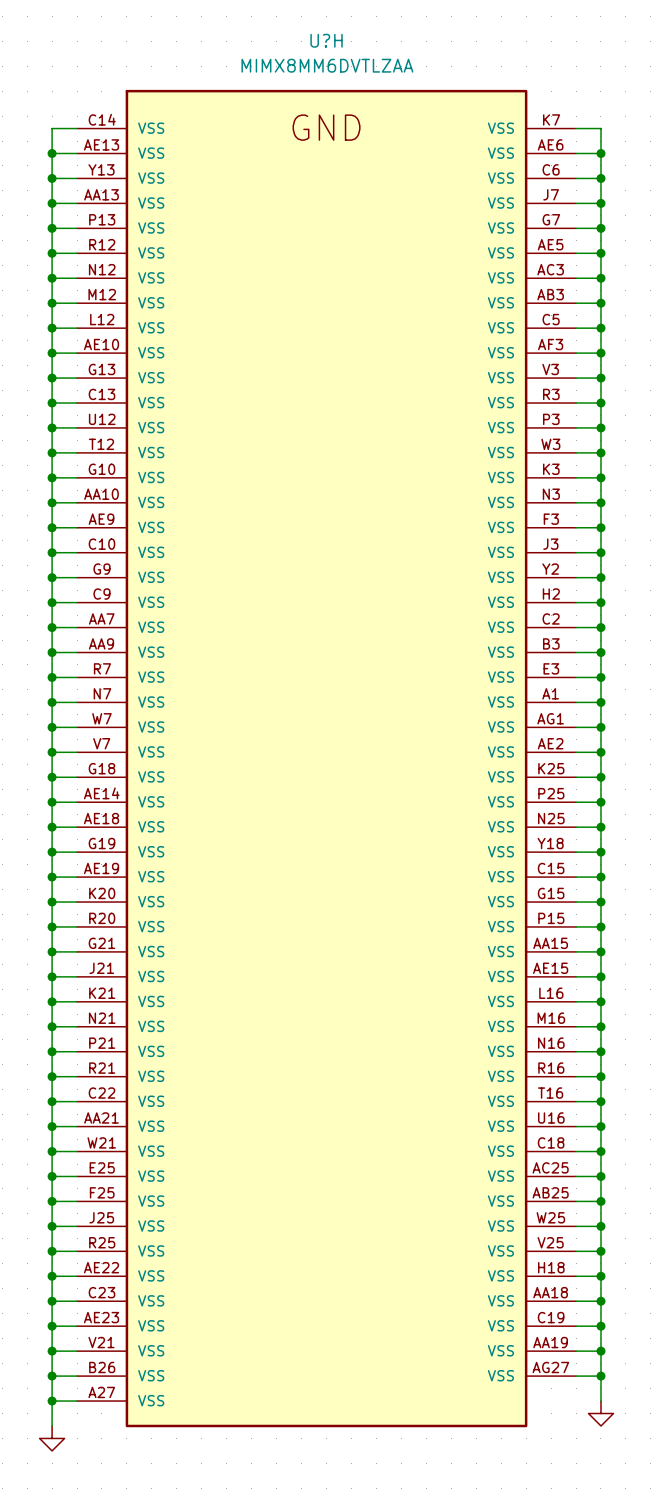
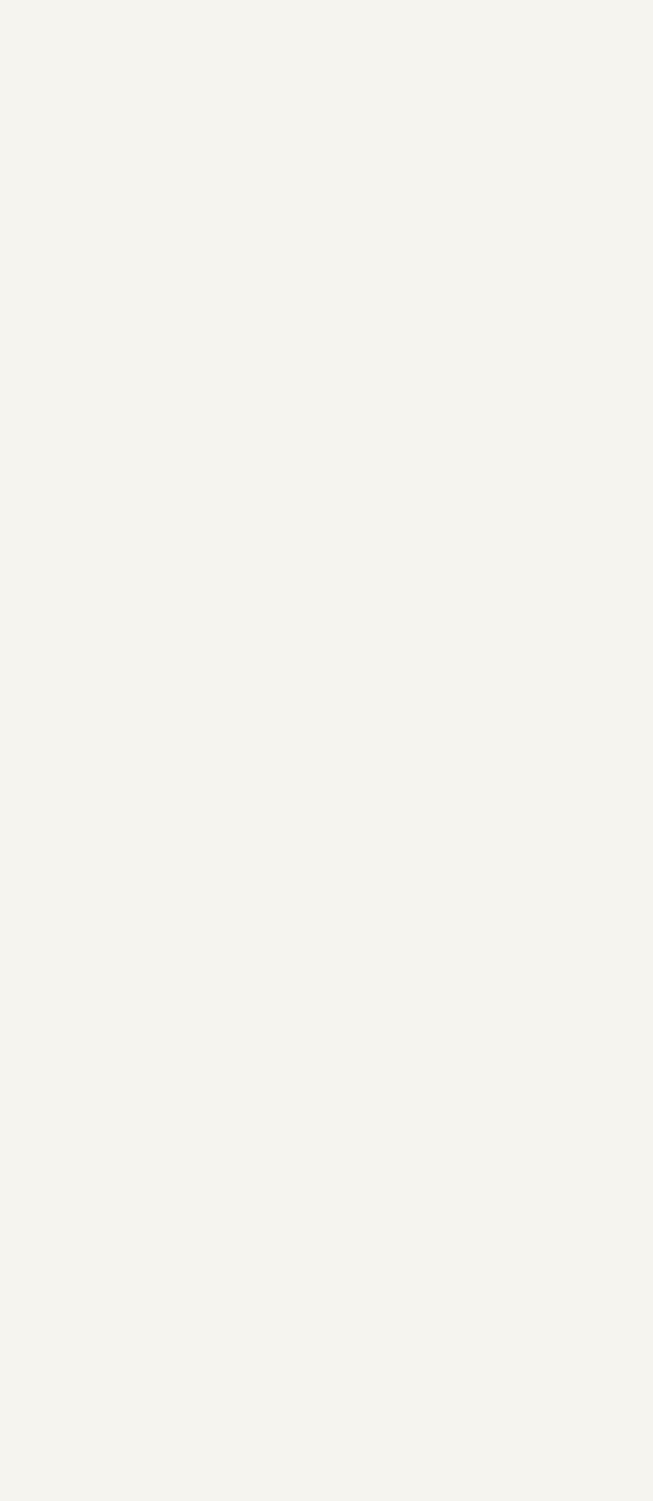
wire: (77, 128) (52, 128) (52, 1425) -> none
wire: (576, 128) (600, 128) (600, 1401) -> none
wire: (52, 153) (77, 153) -> none
junction: (52, 153) -> none
wire: (576, 153) (600, 153) -> none
junction: (600, 153) -> none
wire: (52, 178) (77, 178) -> none
junction: (52, 178) -> none
wire: (576, 178) (600, 178) -> none
junction: (600, 178) -> none
wire: (52, 203) (77, 203) -> none
junction: (52, 203) -> none
wire: (576, 203) (600, 203) -> none
junction: (600, 203) -> none
wire: (52, 228) (77, 228) -> none
junction: (52, 228) -> none
wire: (576, 228) (600, 228) -> none
junction: (600, 228) -> none
wire: (52, 253) (77, 253) -> none
junction: (52, 253) -> none
wire: (576, 253) (600, 253) -> none
junction: (600, 253) -> none
wire: (52, 278) (77, 278) -> none
junction: (52, 278) -> none
wire: (576, 278) (600, 278) -> none
junction: (600, 278) -> none
wire: (52, 303) (77, 303) -> none
junction: (52, 303) -> none
wire: (576, 303) (600, 303) -> none
junction: (600, 303) -> none
wire: (52, 328) (77, 328) -> none
junction: (52, 328) -> none
wire: (576, 328) (600, 328) -> none
junction: (600, 328) -> none
wire: (52, 353) (77, 353) -> none
junction: (52, 353) -> none
wire: (576, 353) (600, 353) -> none
junction: (600, 353) -> none
wire: (52, 378) (77, 378) -> none
junction: (52, 378) -> none
wire: (576, 378) (600, 378) -> none
junction: (600, 378) -> none
wire: (52, 403) (77, 403) -> none
junction: (52, 403) -> none
wire: (576, 403) (600, 403) -> none
junction: (600, 403) -> none
wire: (52, 427) (77, 427) -> none
junction: (52, 427) -> none
wire: (576, 427) (600, 427) -> none
junction: (600, 427) -> none
wire: (52, 452) (77, 452) -> none
junction: (52, 452) -> none
wire: (576, 452) (600, 452) -> none
junction: (600, 452) -> none
wire: (52, 477) (77, 477) -> none
junction: (52, 477) -> none
wire: (576, 477) (600, 477) -> none
junction: (600, 477) -> none
wire: (52, 502) (77, 502) -> none
junction: (52, 502) -> none
wire: (576, 502) (600, 502) -> none
junction: (600, 502) -> none
wire: (52, 527) (77, 527) -> none
junction: (52, 527) -> none
wire: (576, 527) (600, 527) -> none
junction: (600, 527) -> none
wire: (52, 552) (77, 552) -> none
junction: (52, 552) -> none
wire: (576, 552) (600, 552) -> none
junction: (600, 552) -> none
wire: (52, 577) (77, 577) -> none
junction: (52, 577) -> none
wire: (576, 577) (600, 577) -> none
junction: (600, 577) -> none
wire: (52, 602) (77, 602) -> none
junction: (52, 602) -> none
wire: (576, 602) (600, 602) -> none
junction: (600, 602) -> none
wire: (52, 627) (77, 627) -> none
junction: (52, 627) -> none
wire: (576, 627) (600, 627) -> none
junction: (600, 627) -> none
wire: (52, 652) (77, 652) -> none
junction: (52, 652) -> none
wire: (576, 652) (600, 652) -> none
junction: (600, 652) -> none
wire: (52, 677) (77, 677) -> none
junction: (52, 677) -> none
wire: (576, 677) (600, 677) -> none
junction: (600, 677) -> none
wire: (52, 702) (77, 702) -> none
junction: (52, 702) -> none
wire: (576, 702) (600, 702) -> none
junction: (600, 702) -> none
wire: (52, 727) (77, 727) -> none
junction: (52, 727) -> none
wire: (576, 727) (600, 727) -> none
junction: (600, 727) -> none
wire: (52, 752) (77, 752) -> none
junction: (52, 752) -> none
wire: (576, 752) (600, 752) -> none
junction: (600, 752) -> none
U?H: MIMX8MM6DVTLZAA (326, 758) -> none
wire: (52, 777) (77, 777) -> none
junction: (52, 777) -> none
wire: (576, 777) (600, 777) -> none
junction: (600, 777) -> none
wire: (52, 802) (77, 802) -> none
junction: (52, 802) -> none
wire: (576, 802) (600, 802) -> none
junction: (600, 802) -> none
wire: (52, 827) (77, 827) -> none
junction: (52, 827) -> none
wire: (576, 827) (600, 827) -> none
junction: (600, 827) -> none
wire: (52, 852) (77, 852) -> none
junction: (52, 852) -> none
wire: (576, 852) (600, 852) -> none
junction: (600, 852) -> none
wire: (52, 877) (77, 877) -> none
junction: (52, 877) -> none
wire: (576, 877) (600, 877) -> none
junction: (600, 877) -> none
wire: (52, 902) (77, 902) -> none
junction: (52, 902) -> none
wire: (576, 902) (600, 902) -> none
junction: (600, 902) -> none
wire: (52, 926) (77, 926) -> none
junction: (52, 926) -> none
wire: (576, 926) (600, 926) -> none
junction: (600, 926) -> none
wire: (52, 951) (77, 951) -> none
junction: (52, 951) -> none
wire: (576, 951) (600, 951) -> none
junction: (600, 951) -> none
wire: (52, 976) (77, 976) -> none
junction: (52, 976) -> none
wire: (576, 976) (600, 976) -> none
junction: (600, 976) -> none
wire: (52, 1001) (77, 1001) -> none
junction: (52, 1001) -> none
wire: (576, 1001) (600, 1001) -> none
junction: (600, 1001) -> none
wire: (52, 1026) (77, 1026) -> none
junction: (52, 1026) -> none
wire: (576, 1026) (600, 1026) -> none
junction: (600, 1026) -> none
wire: (52, 1051) (77, 1051) -> none
junction: (52, 1051) -> none
wire: (576, 1051) (600, 1051) -> none
junction: (600, 1051) -> none
wire: (52, 1076) (77, 1076) -> none
junction: (52, 1076) -> none
wire: (576, 1076) (600, 1076) -> none
junction: (600, 1076) -> none
wire: (52, 1101) (77, 1101) -> none
junction: (52, 1101) -> none
wire: (576, 1101) (600, 1101) -> none
junction: (600, 1101) -> none
wire: (52, 1126) (77, 1126) -> none
junction: (52, 1126) -> none
wire: (576, 1126) (600, 1126) -> none
junction: (600, 1126) -> none
wire: (52, 1151) (77, 1151) -> none
junction: (52, 1151) -> none
wire: (576, 1151) (600, 1151) -> none
junction: (600, 1151) -> none
wire: (52, 1176) (77, 1176) -> none
junction: (52, 1176) -> none
wire: (576, 1176) (600, 1176) -> none
junction: (600, 1176) -> none
wire: (52, 1201) (77, 1201) -> none
junction: (52, 1201) -> none
wire: (576, 1201) (600, 1201) -> none
junction: (600, 1201) -> none
wire: (52, 1226) (77, 1226) -> none
junction: (52, 1226) -> none
wire: (576, 1226) (600, 1226) -> none
junction: (600, 1226) -> none
wire: (52, 1251) (77, 1251) -> none
junction: (52, 1251) -> none
wire: (576, 1251) (600, 1251) -> none
junction: (600, 1251) -> none
wire: (52, 1276) (77, 1276) -> none
junction: (52, 1276) -> none
wire: (576, 1276) (600, 1276) -> none
junction: (600, 1276) -> none
wire: (52, 1301) (77, 1301) -> none
junction: (52, 1301) -> none
wire: (576, 1301) (600, 1301) -> none
junction: (600, 1301) -> none
wire: (52, 1326) (77, 1326) -> none
junction: (52, 1326) -> none
wire: (576, 1326) (600, 1326) -> none
junction: (600, 1326) -> none
wire: (52, 1351) (77, 1351) -> none
junction: (52, 1351) -> none
wire: (576, 1351) (600, 1351) -> none
junction: (600, 1351) -> none
wire: (52, 1376) (77, 1376) -> none
junction: (52, 1376) -> none
wire: (576, 1376) (600, 1376) -> none
junction: (600, 1376) -> none
wire: (52, 1401) (77, 1401) -> none
junction: (52, 1401) -> none
power symbol: (600, 1413) -> none
power symbol: (52, 1438) -> none

